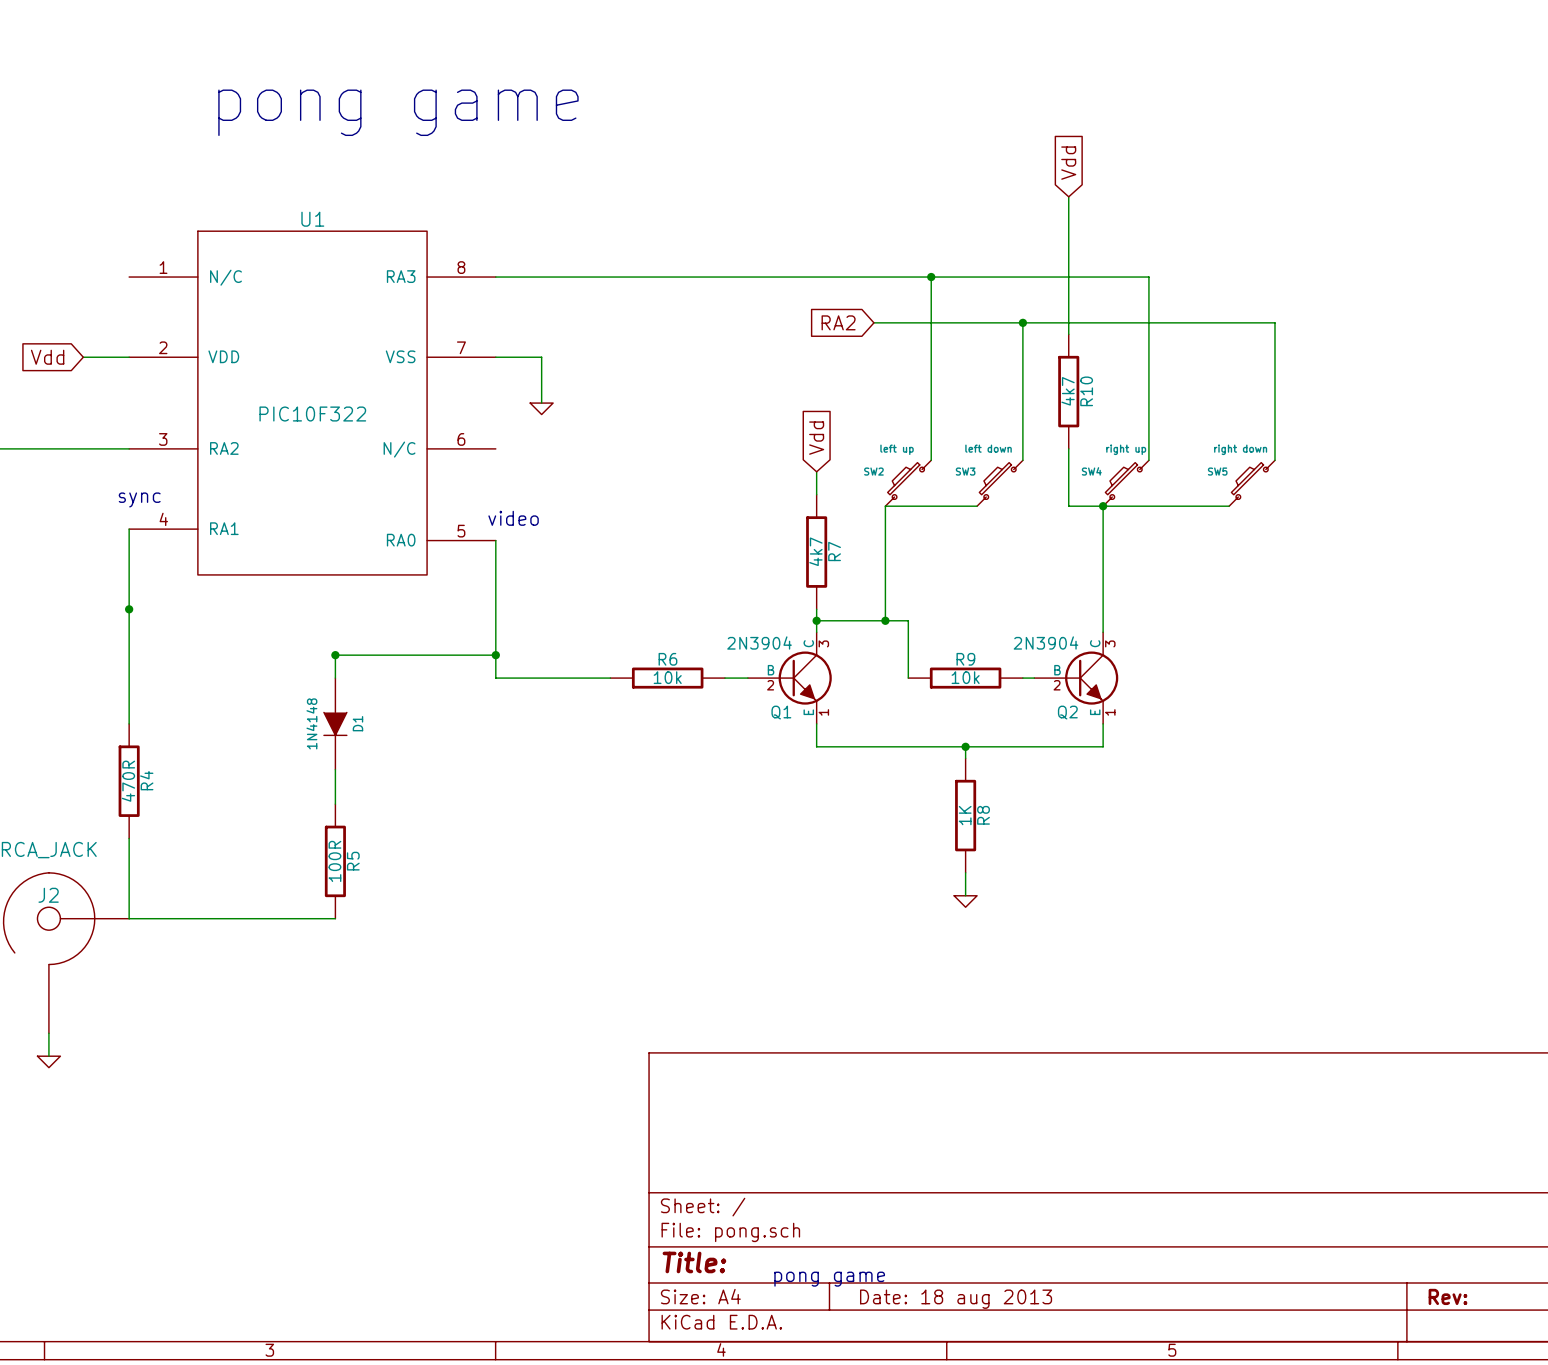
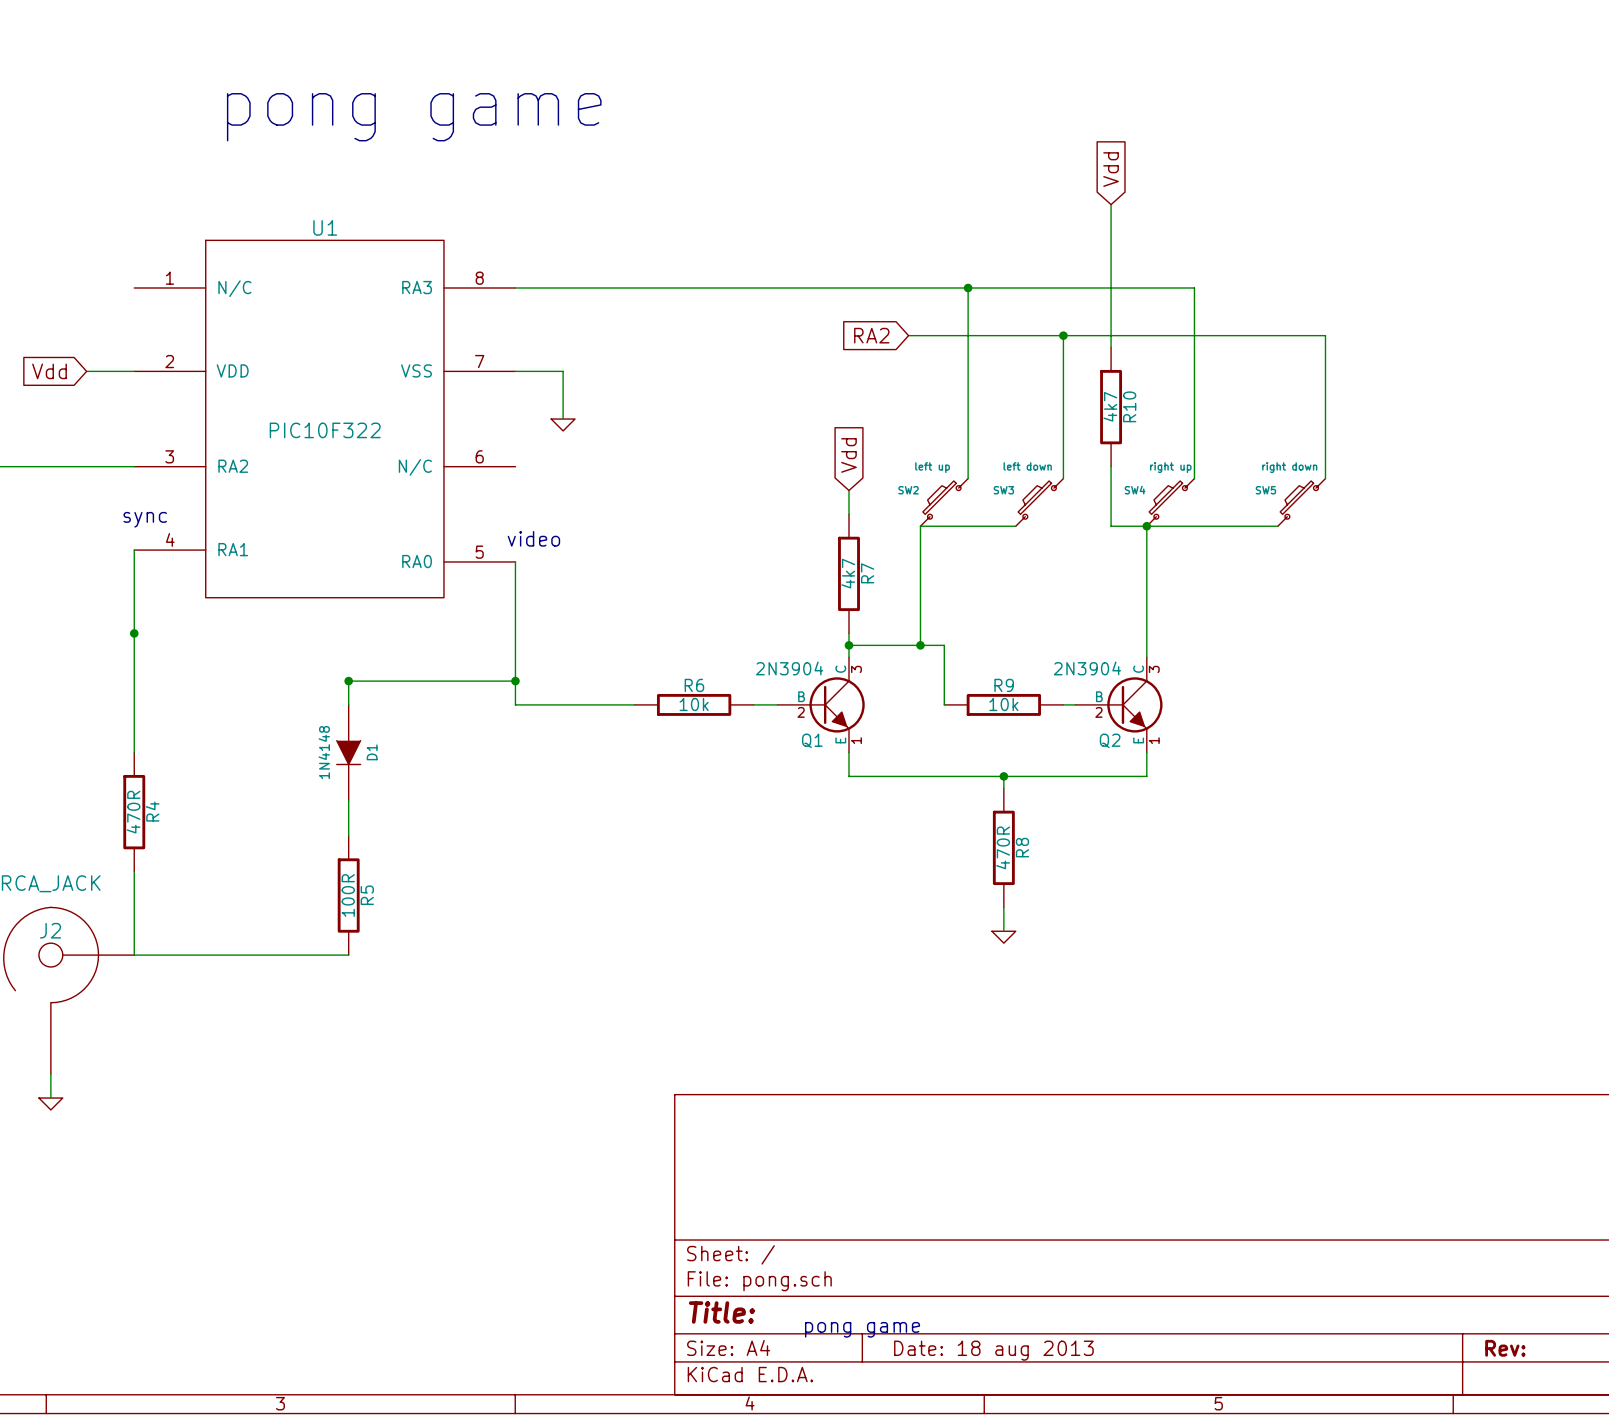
R8 value: 1K (965, 815) -> 470R (1003, 847)

